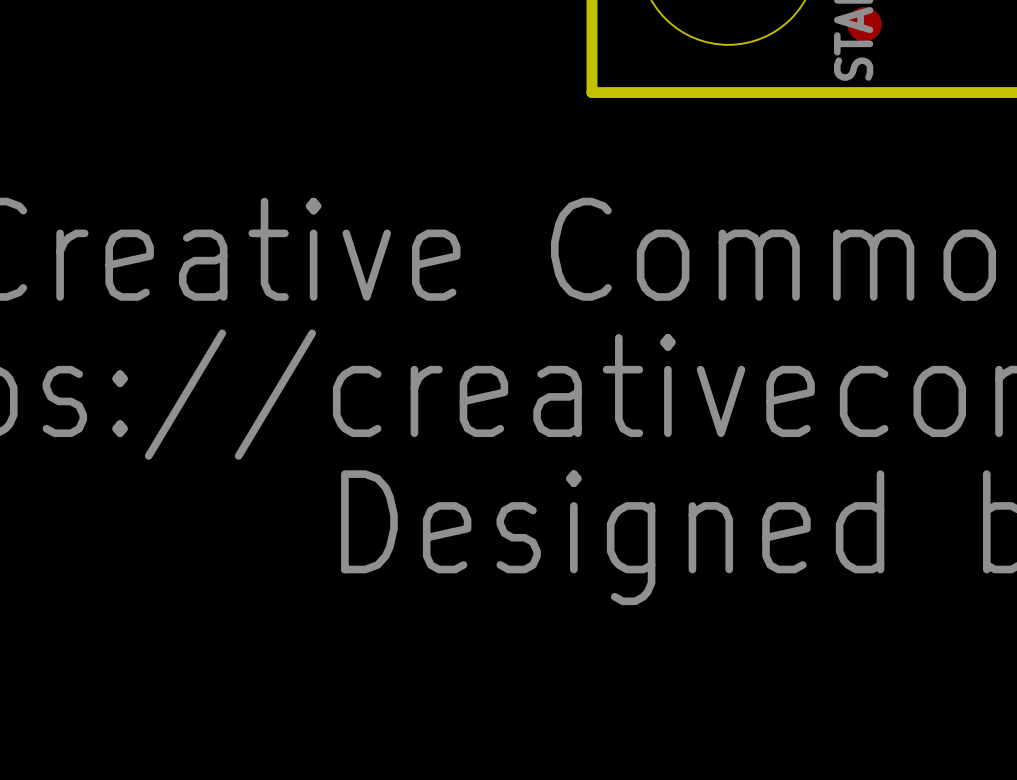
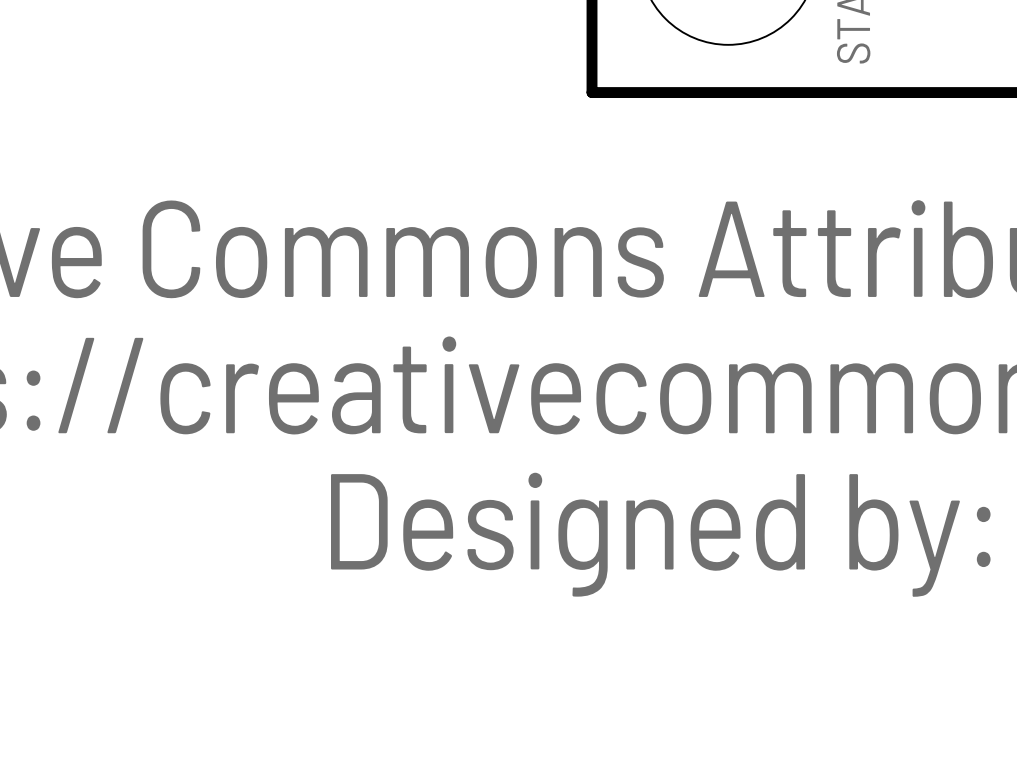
part: (864, 24) -> none

